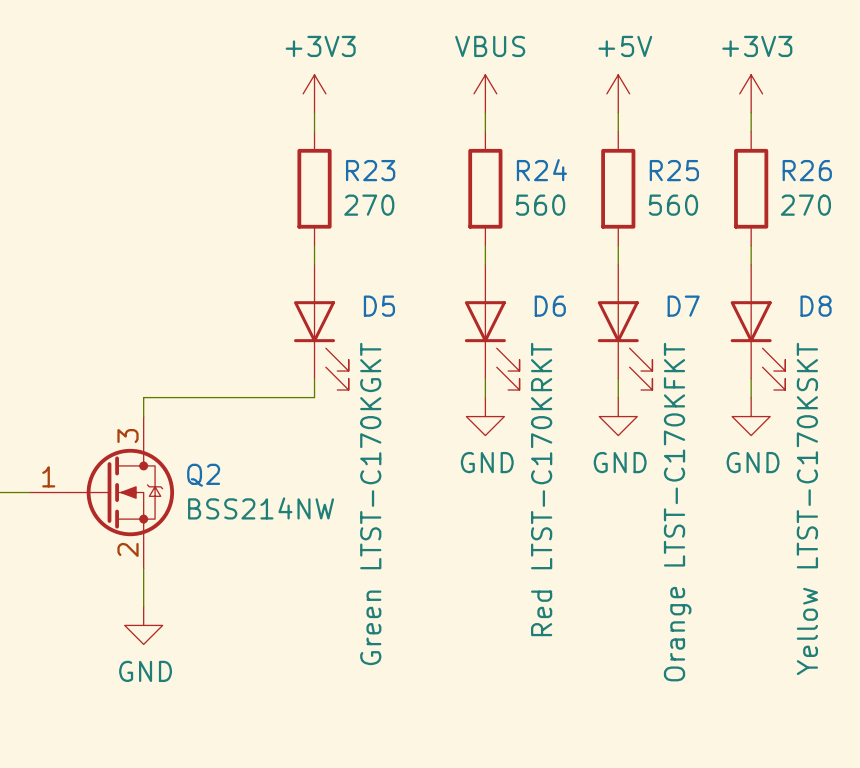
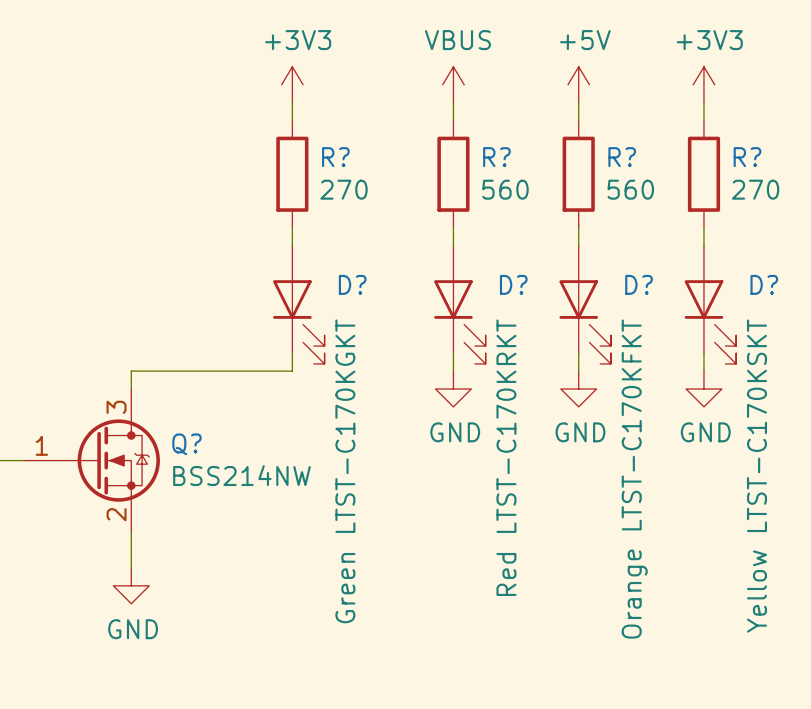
R23 name: R23 (370, 170) -> R? (335, 157)
R24 name: R24 (541, 170) -> R? (496, 157)
R25 name: R25 (674, 170) -> R? (622, 157)
R26 name: R26 (807, 170) -> R? (747, 157)
D5 name: D5 (379, 306) -> D? (352, 284)
D6 name: D6 (550, 306) -> D? (513, 284)
D7 name: D7 (683, 306) -> D? (639, 284)
D8 name: D8 (816, 306) -> D? (764, 284)
Q2 name: Q2 (203, 475) -> Q? (186, 444)

